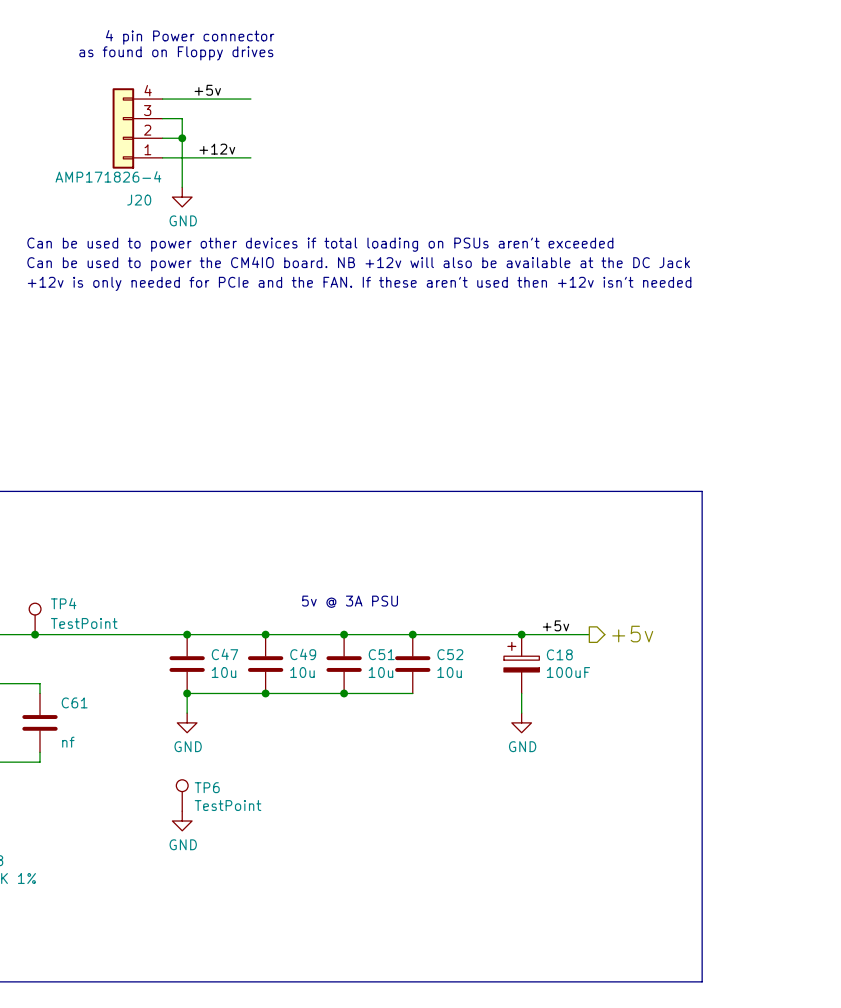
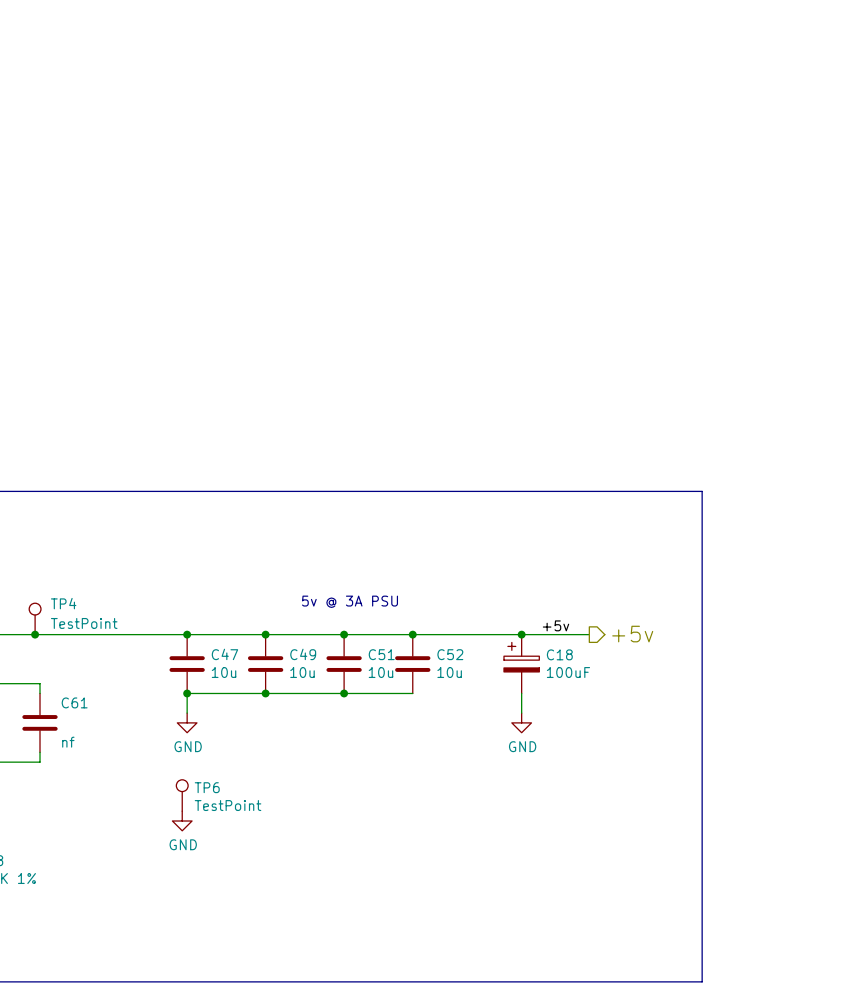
text: 4 pin Power connector (190, 37) -> none
text: as found on Floppy drives (176, 53) -> none
label: +5v (207, 90) -> none
wire: (162, 99) (250, 99) -> none
wire: (162, 118) (182, 118) (182, 187) -> none
J20: AMP171826-4 (137, 128) -> none
wire: (162, 138) (182, 138) -> none
junction: (182, 138) -> none
label: +12v (217, 149) -> none
wire: (162, 157) (250, 157) -> none
power symbol: GND (182, 197) -> none
text: Can be used to power other devices if total loading on PSUs aren't exceeded (320, 244) -> none
text: Can be used to power the CM4IO board. NB +12v will also be available at the DC Jack (358, 264) -> none
text: +12v is only needed for PCIe and the FAN. If these aren't used then +12v isn't needed (359, 283) -> none

